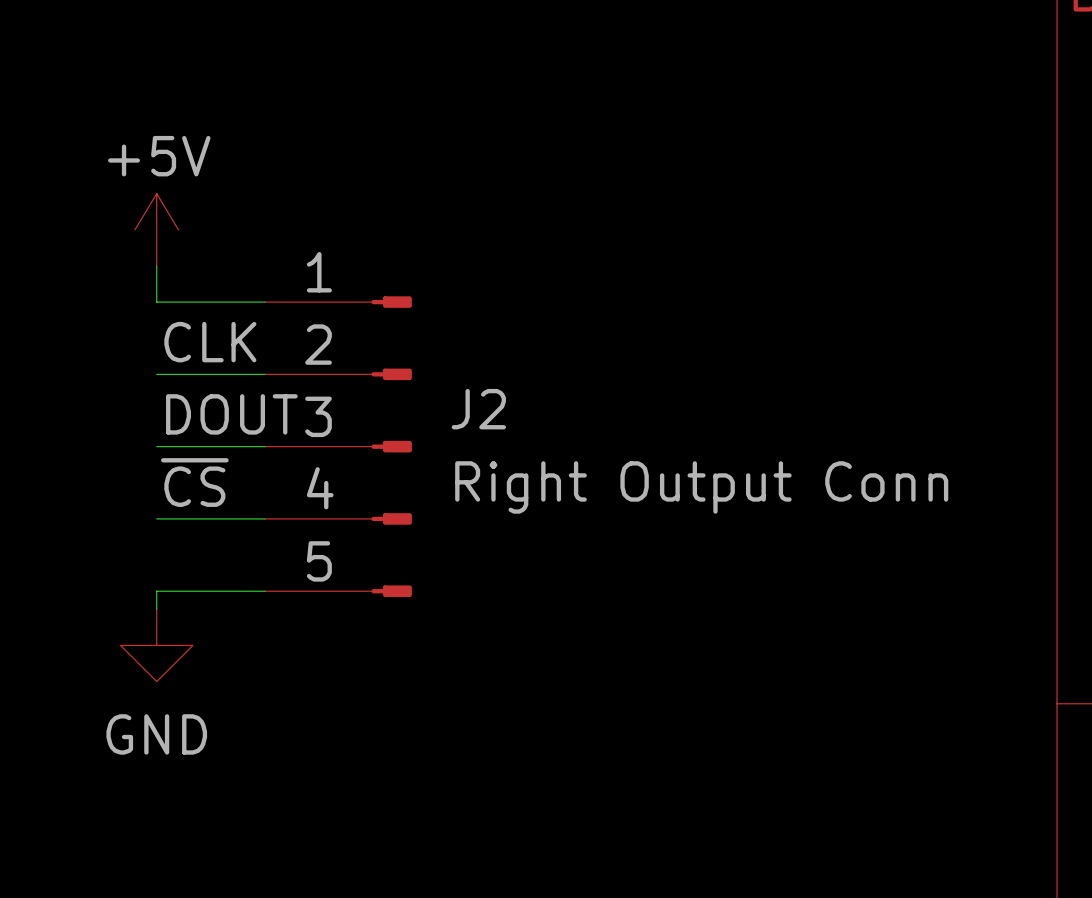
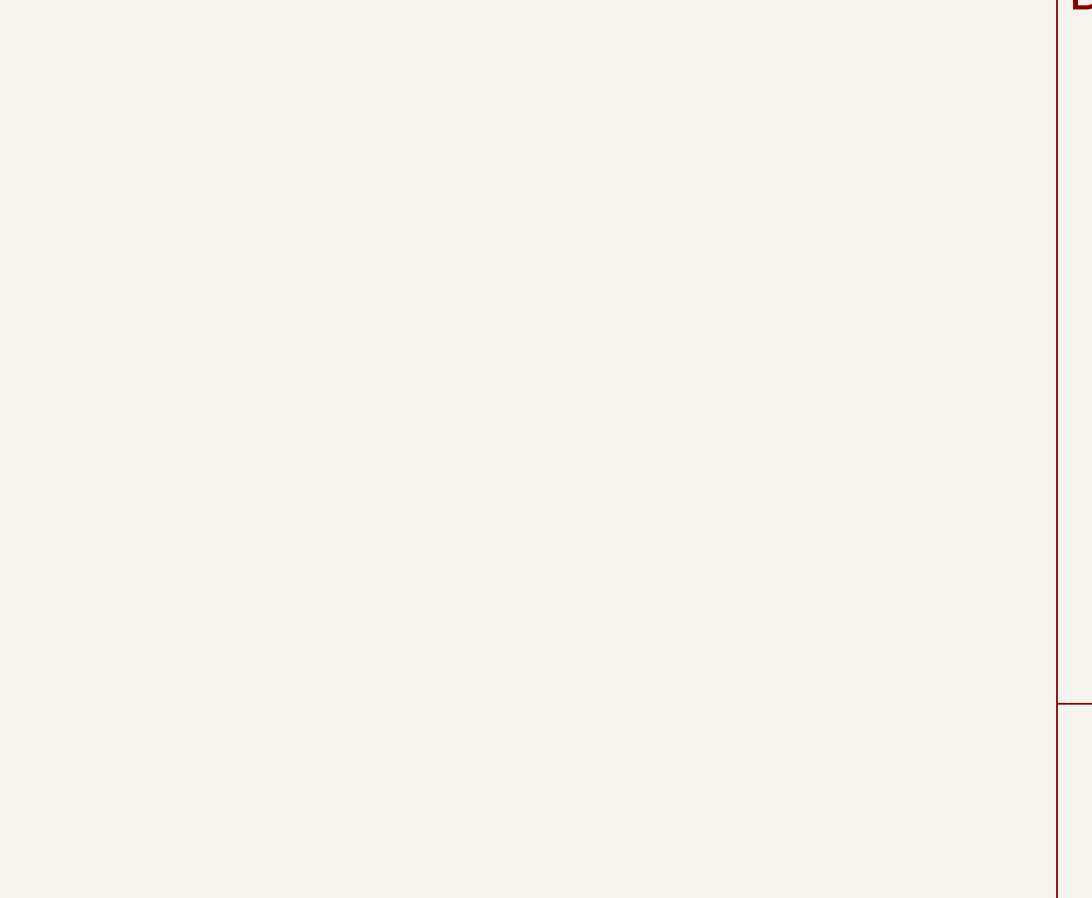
power symbol: +5V (156, 229) -> none
wire: (156, 265) (156, 302) (265, 302) -> none
label: CLK (210, 342) -> none
wire: (156, 374) (265, 374) -> none
label: DOUT (231, 414) -> none
wire: (156, 446) (265, 446) -> none
J2: Right Output Conn (338, 446) -> none
label: ~{CS} (194, 482) -> none
wire: (156, 518) (265, 518) -> none
wire: (265, 591) (156, 591) (156, 609) -> none
power symbol: GND (156, 645) -> none

